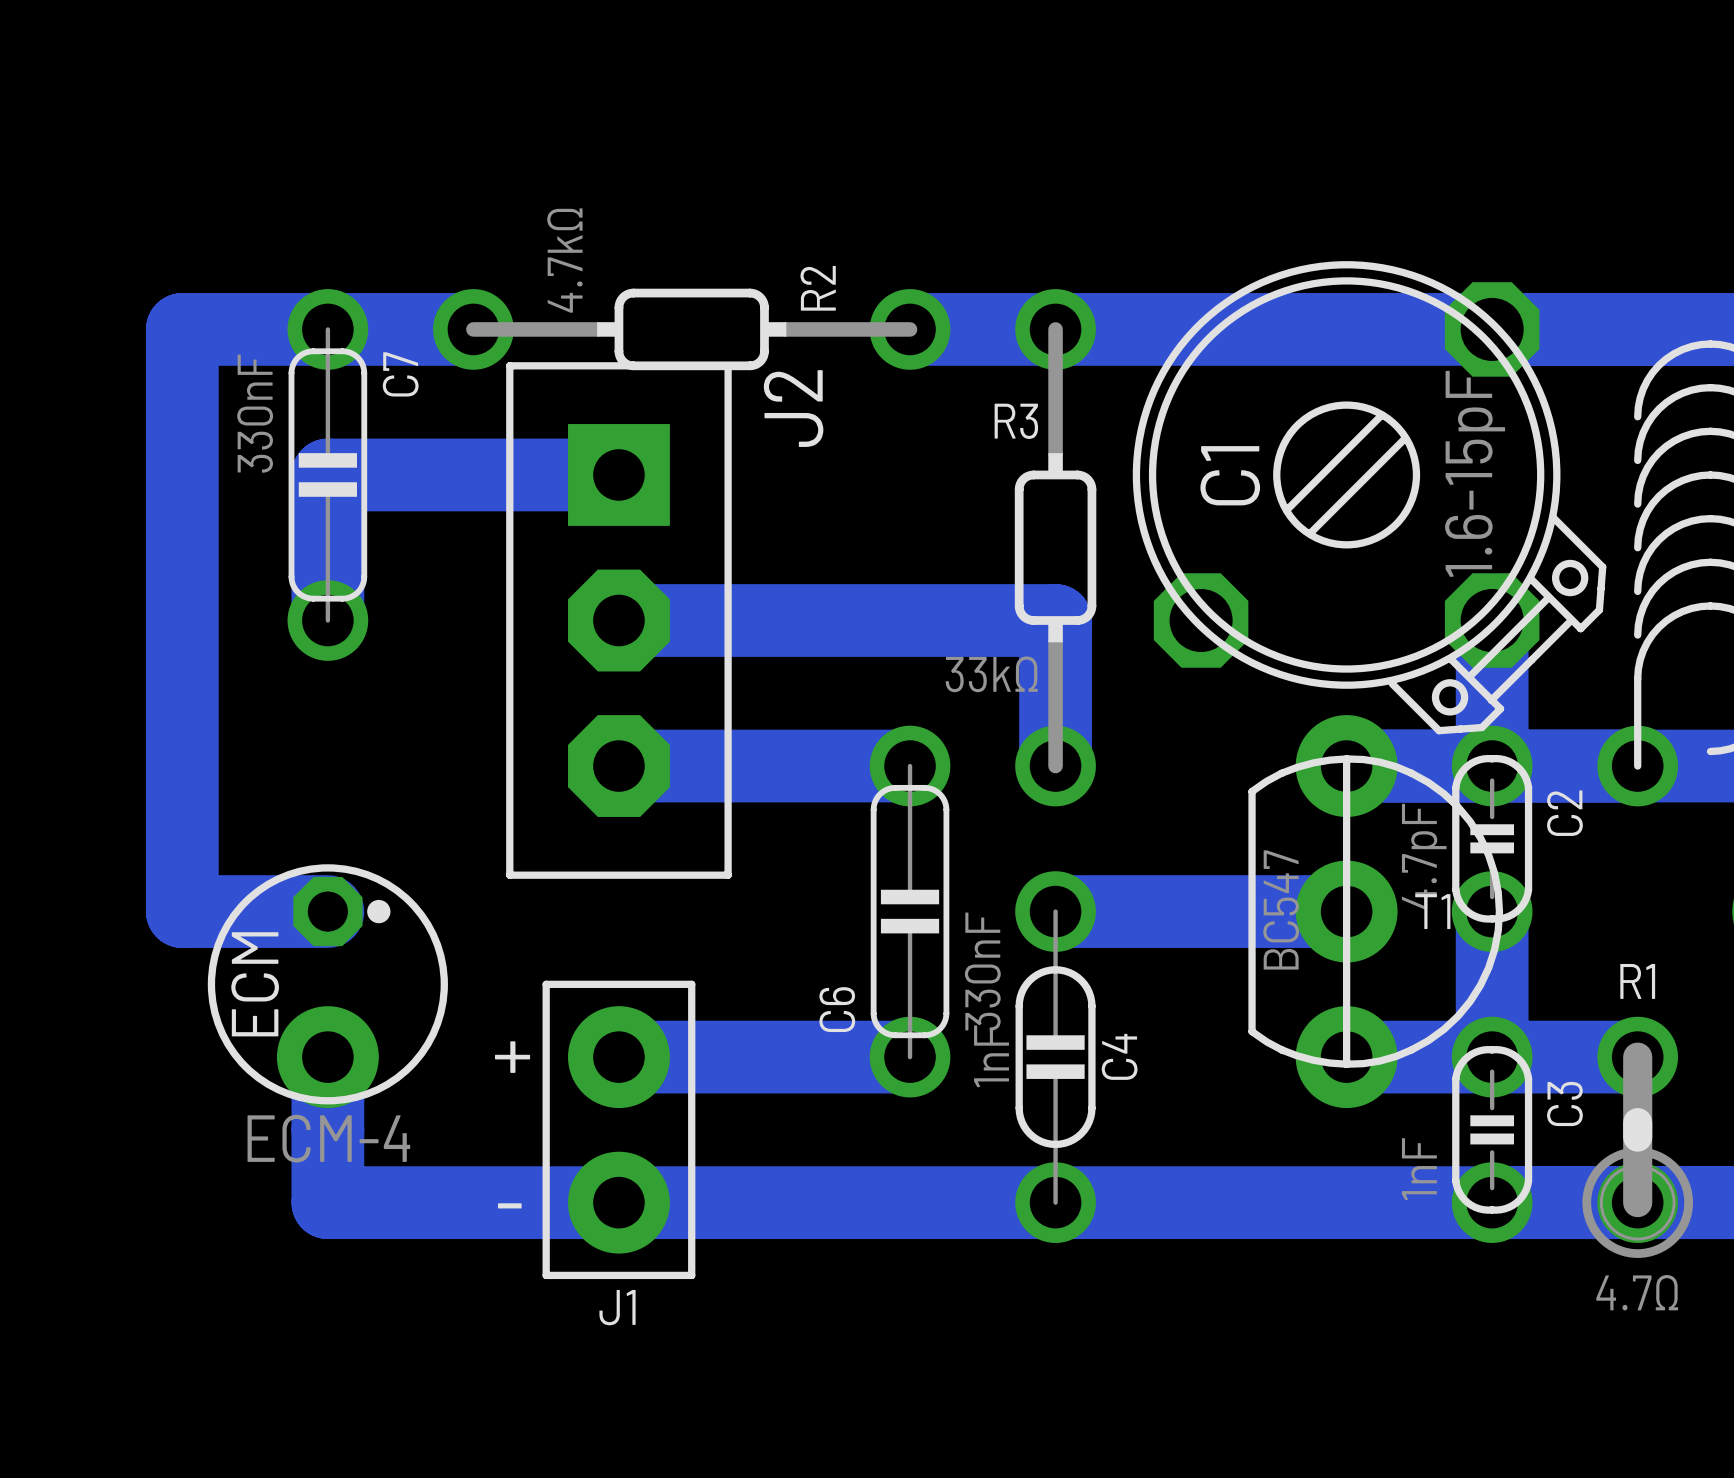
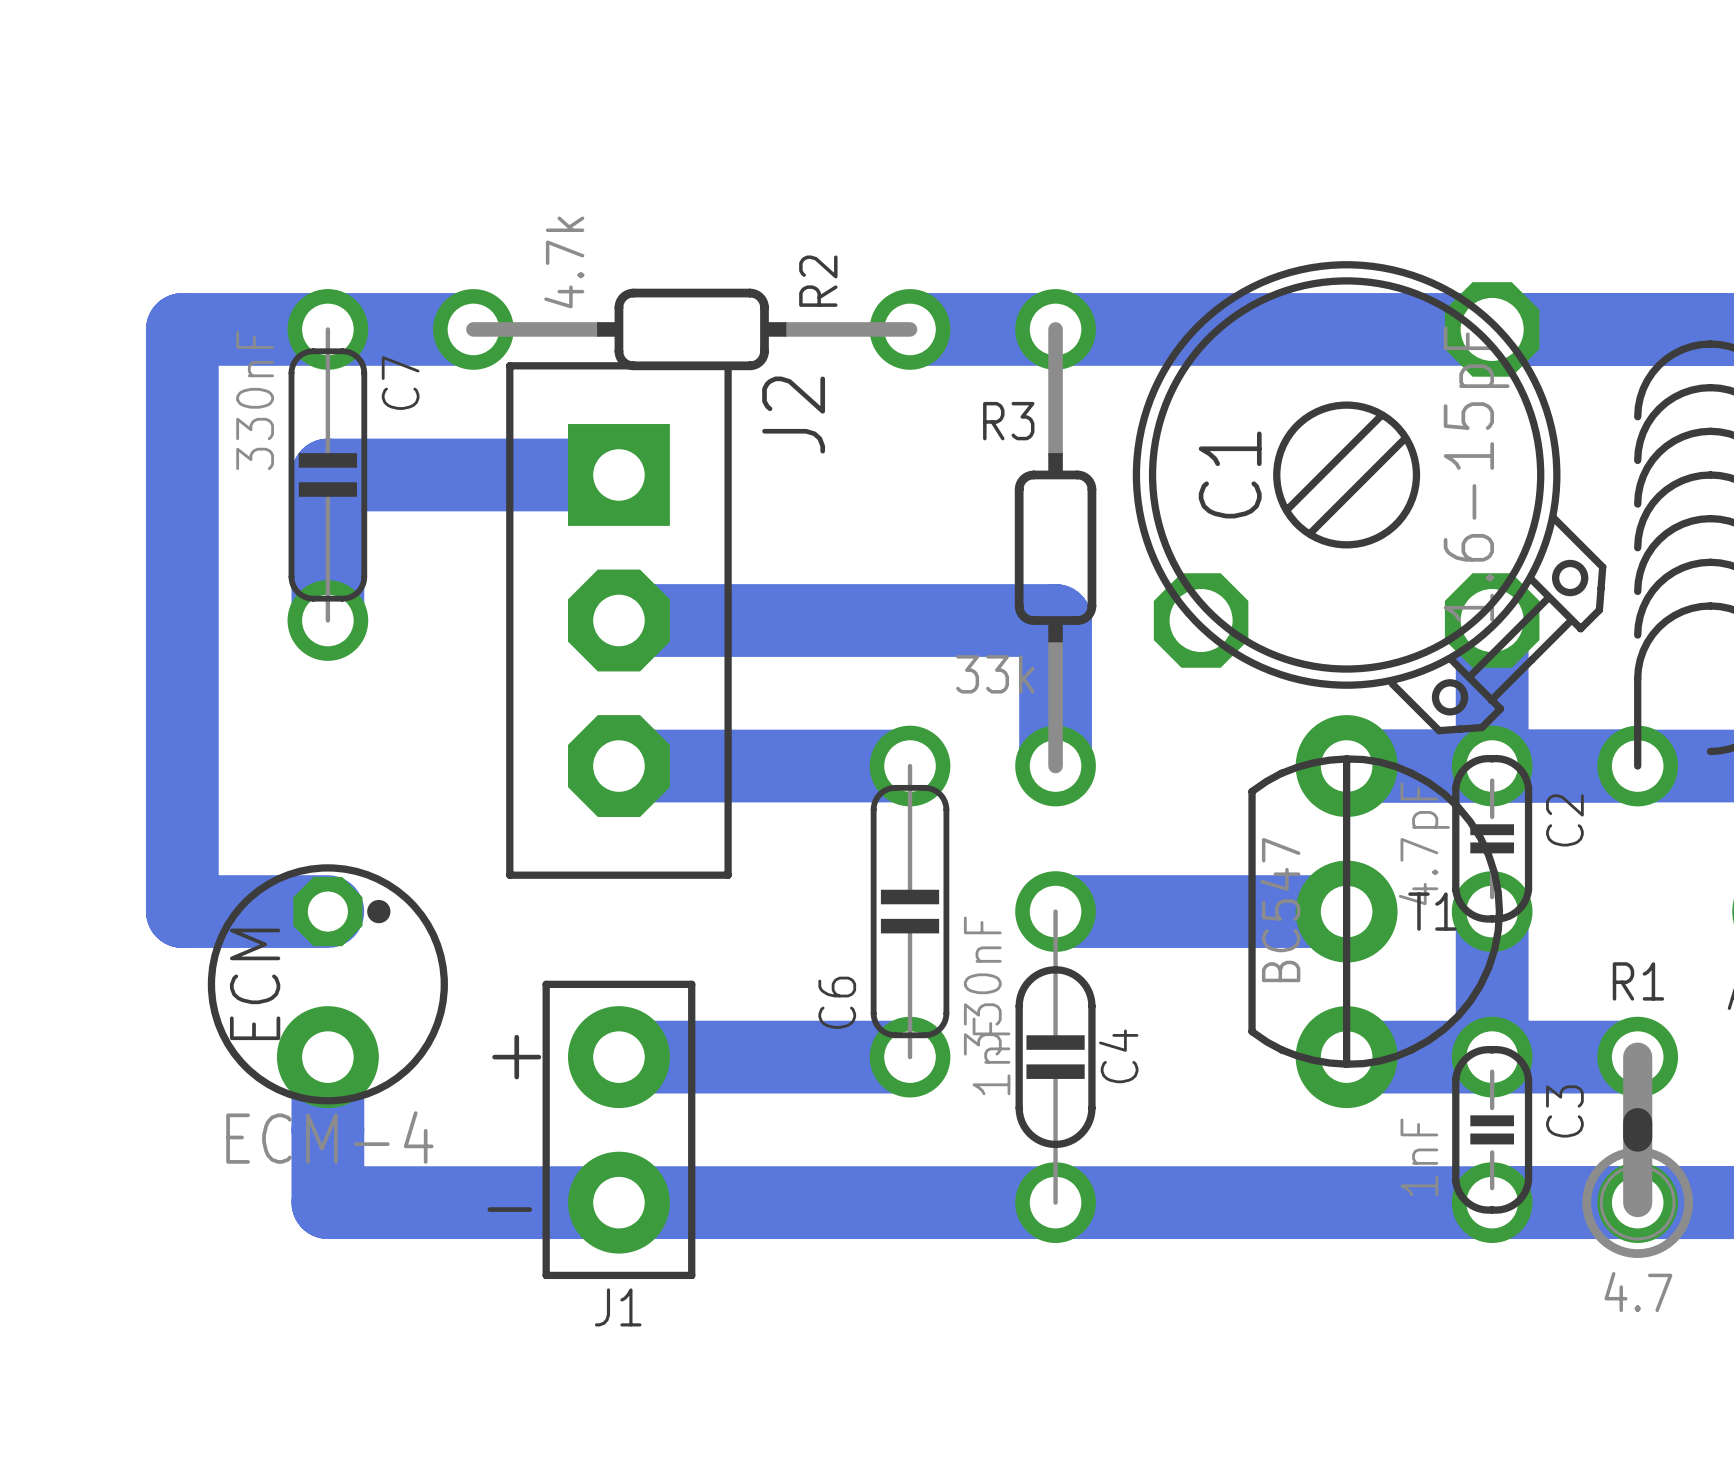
R2 value: 4.7kΩ (564, 260) -> 4.7k (564, 262)
R3 value: 33kΩ (991, 674) -> 33k (995, 674)
R1 value: 4.7Ω (1637, 1292) -> 4.7 (1638, 1292)

